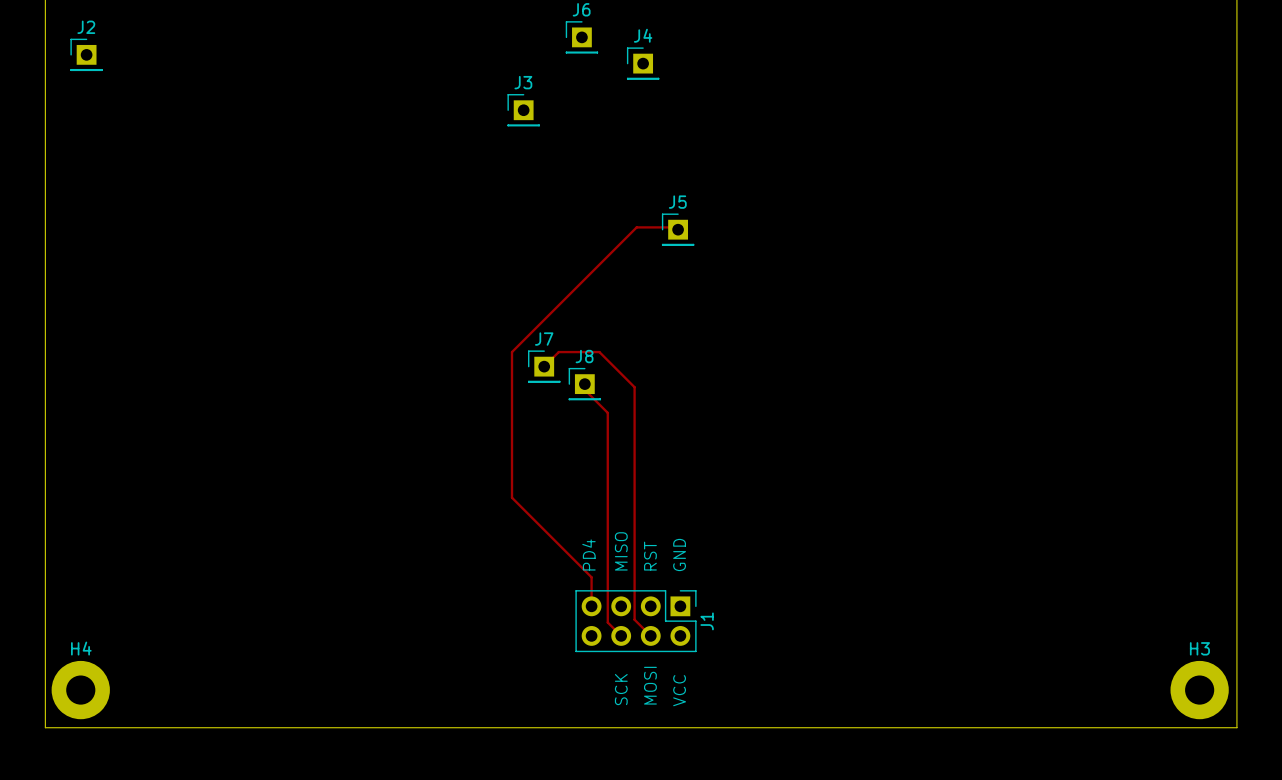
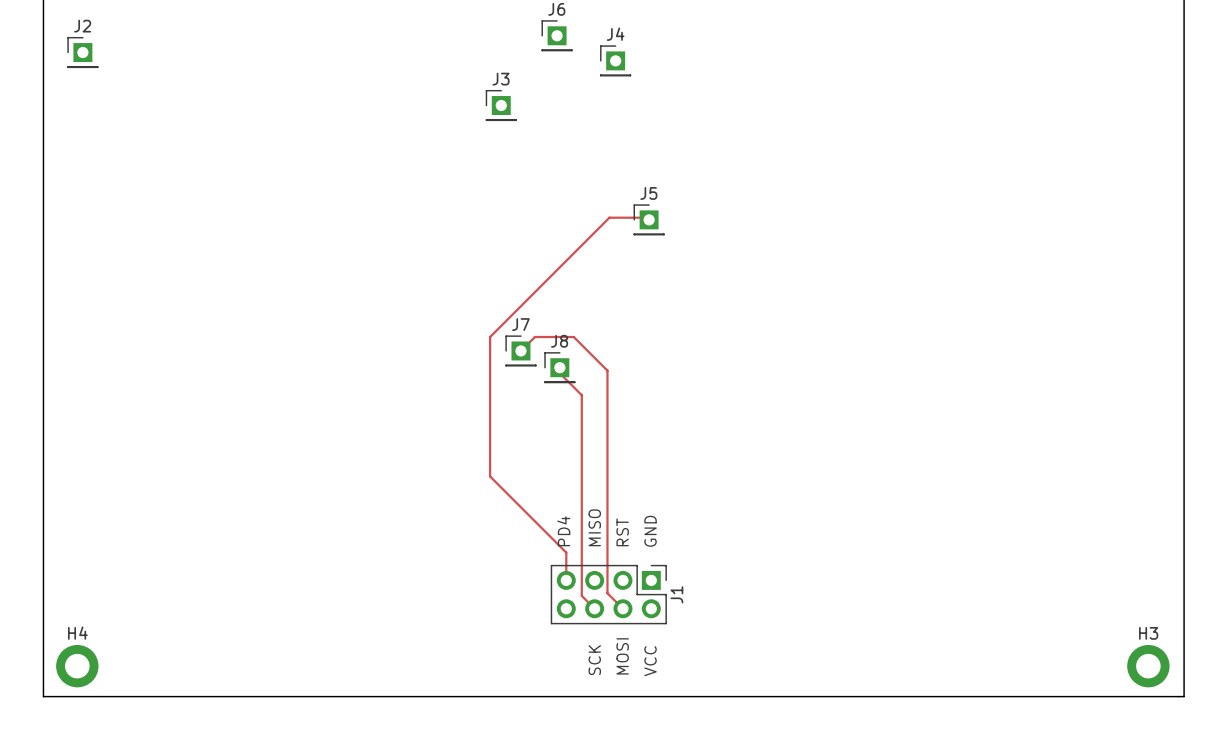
H4 footprint: [51, 660, 110, 720] -> [56, 644, 99, 688]
H3 footprint: [1170, 660, 1229, 720] -> [1127, 644, 1170, 688]

